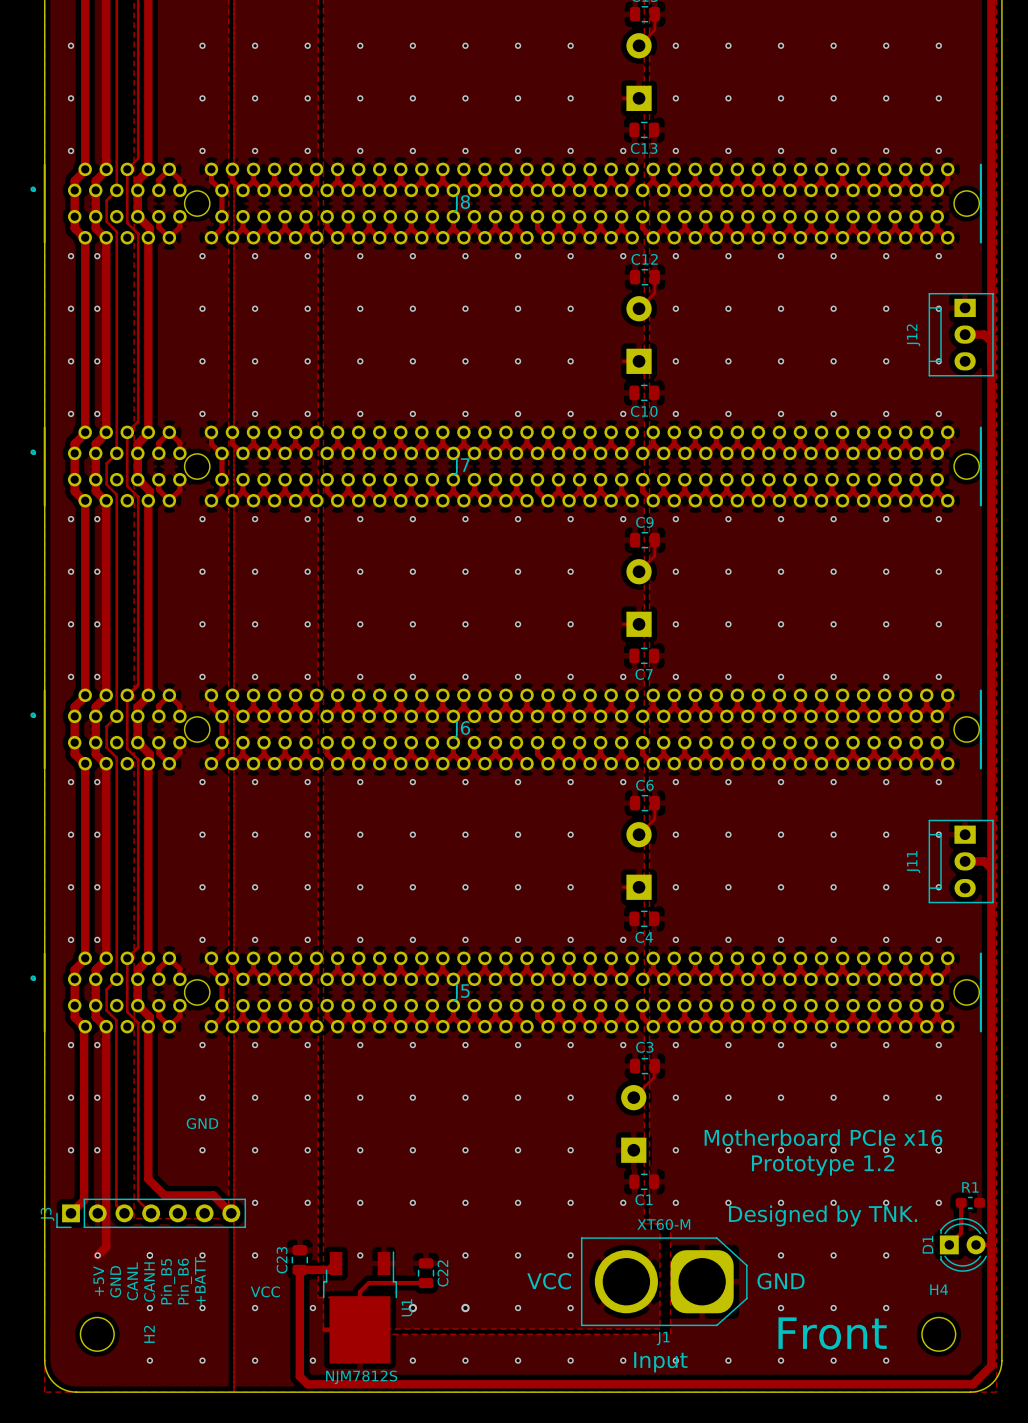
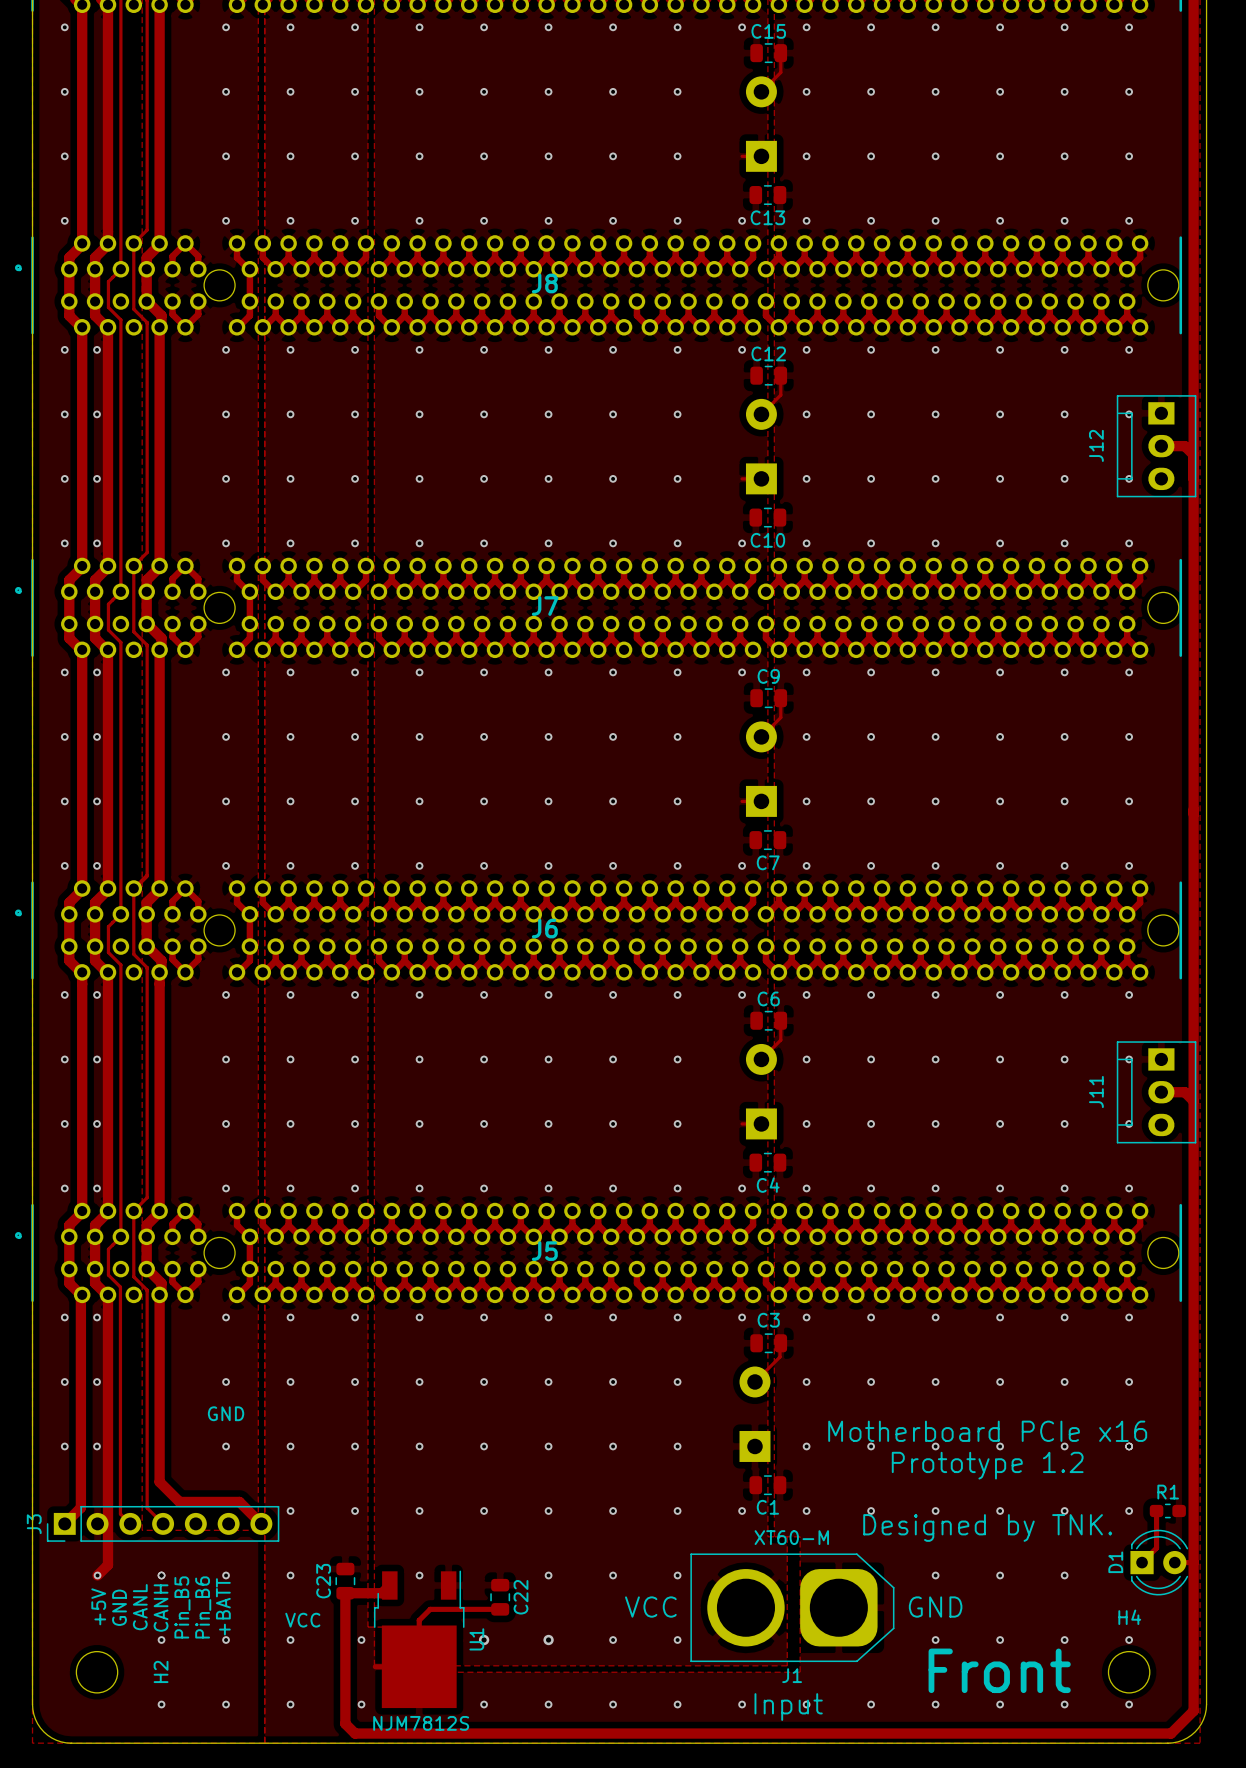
via: none -> (1129, 1640)
via: none -> (1129, 1704)

